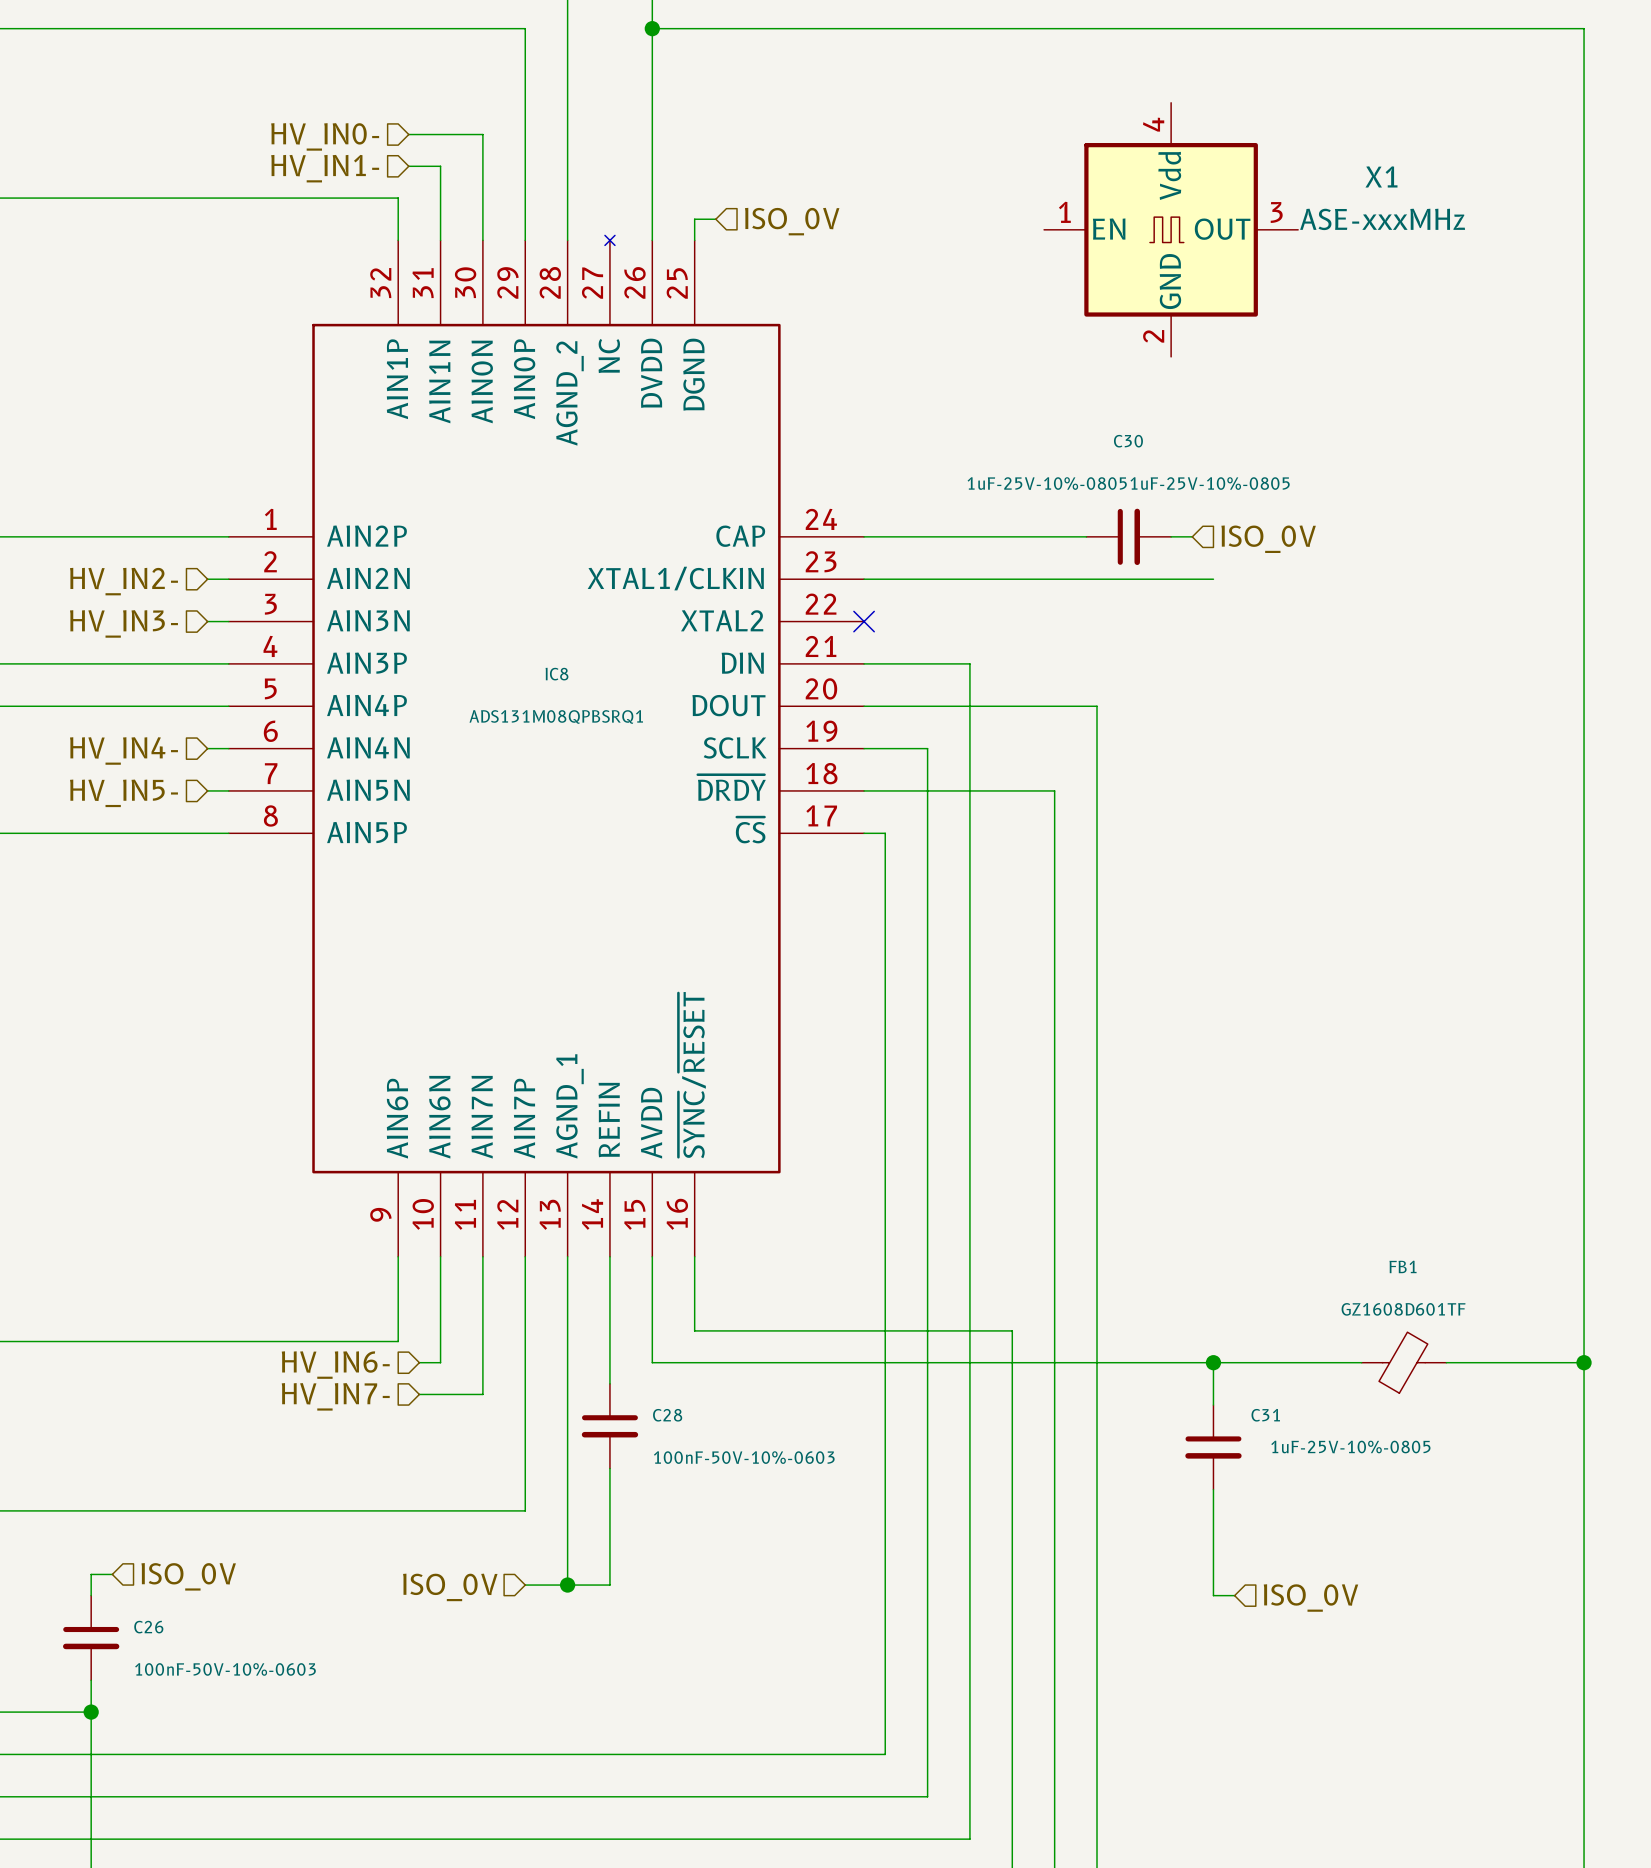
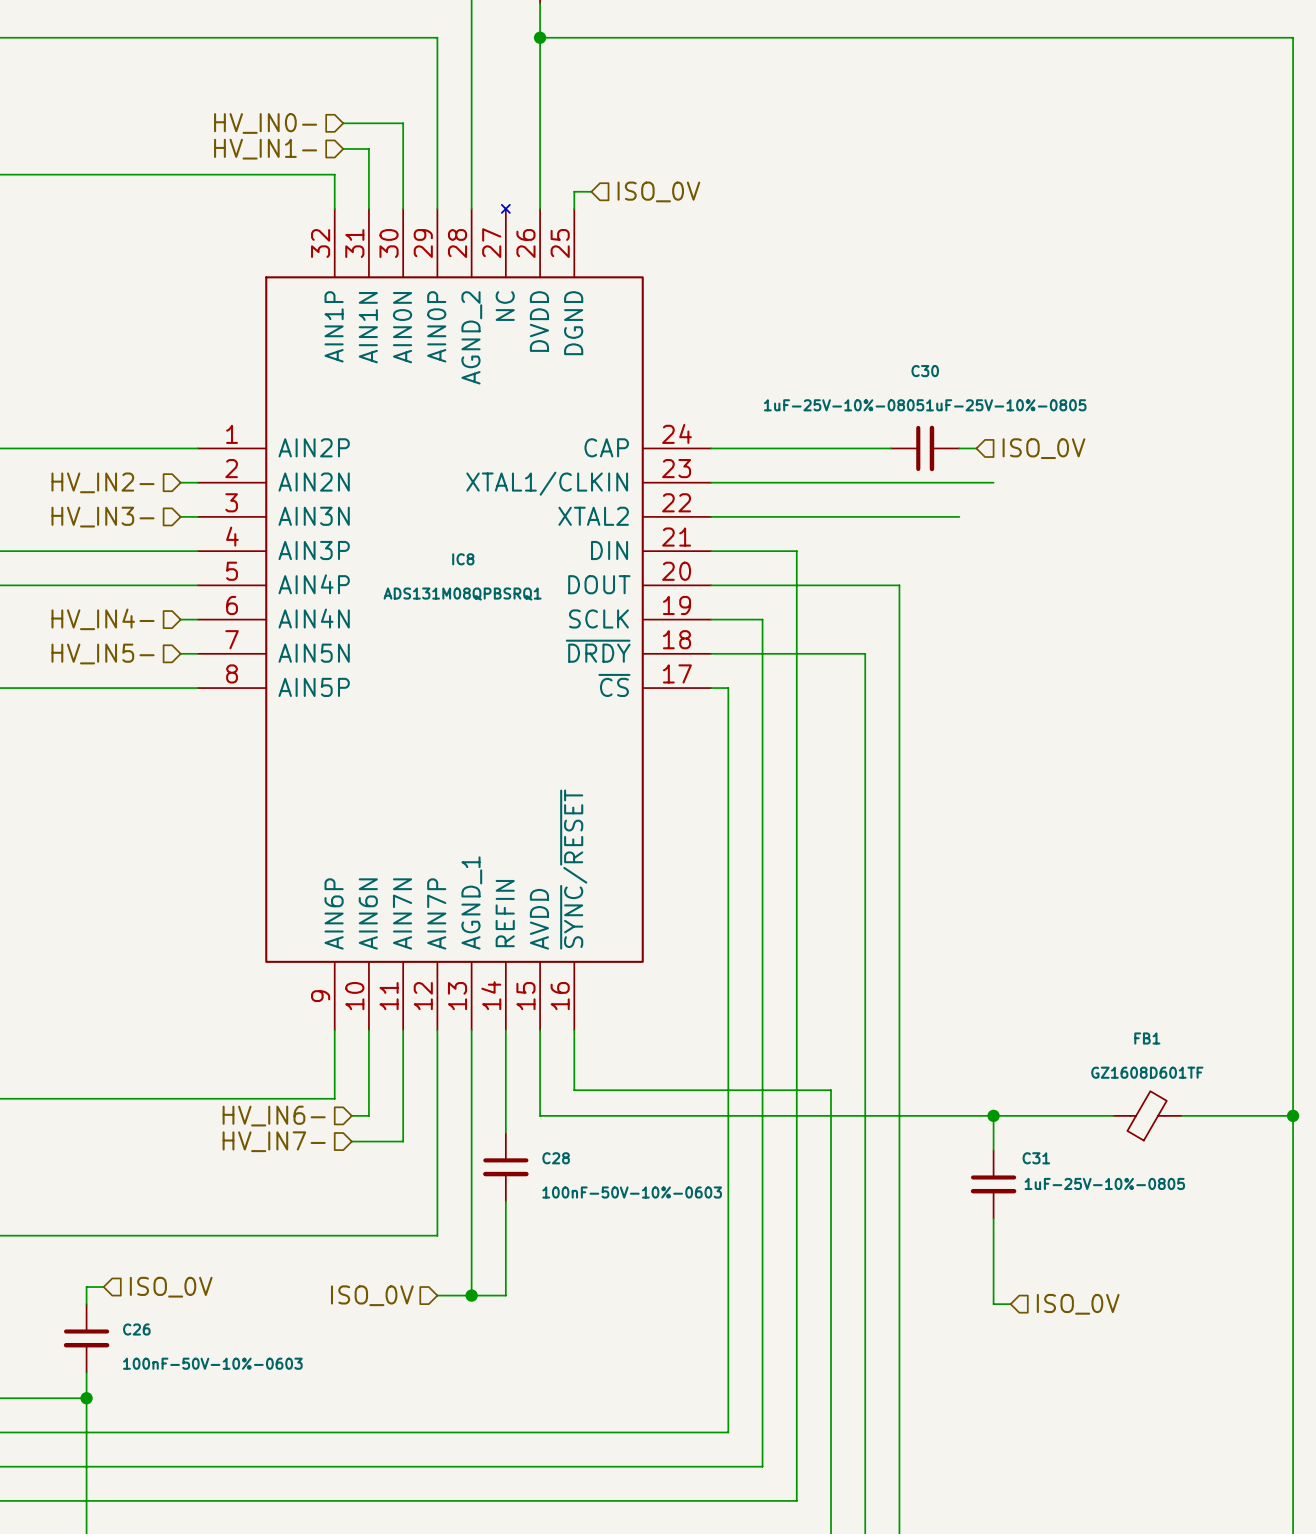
X1: ASE-xxxMHz (1171, 229) -> none
wire: none -> (711, 516) (959, 516)
no-connect mark: (864, 621) -> none

